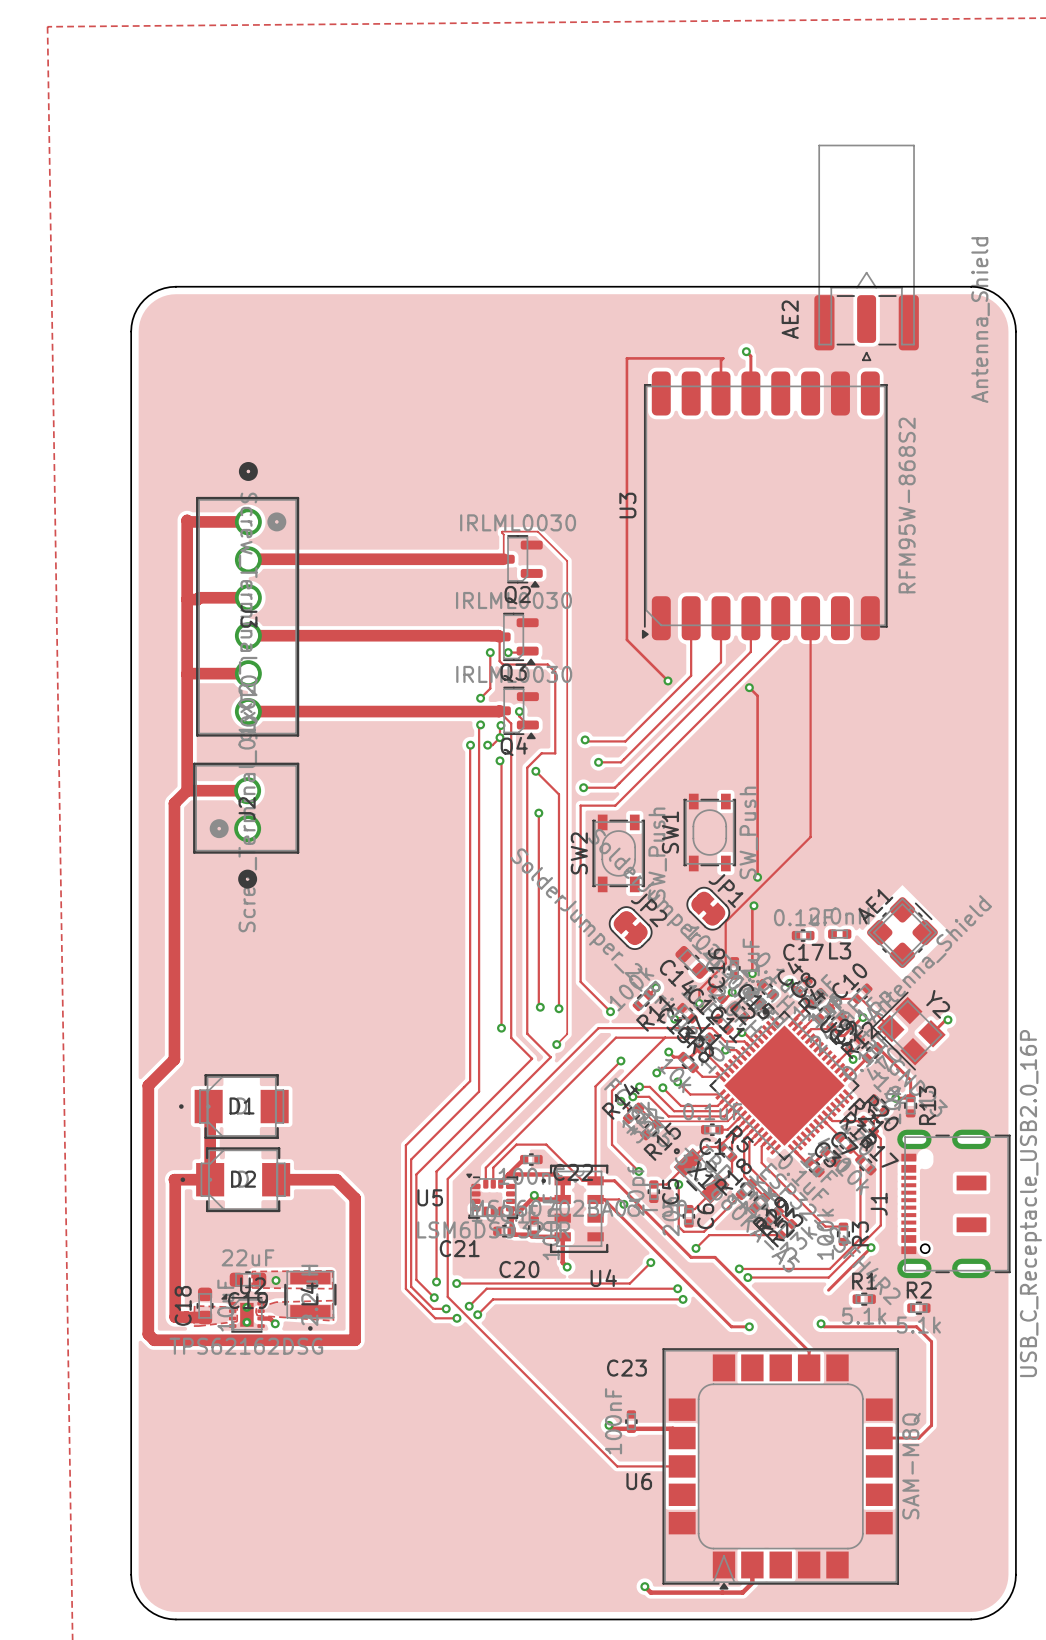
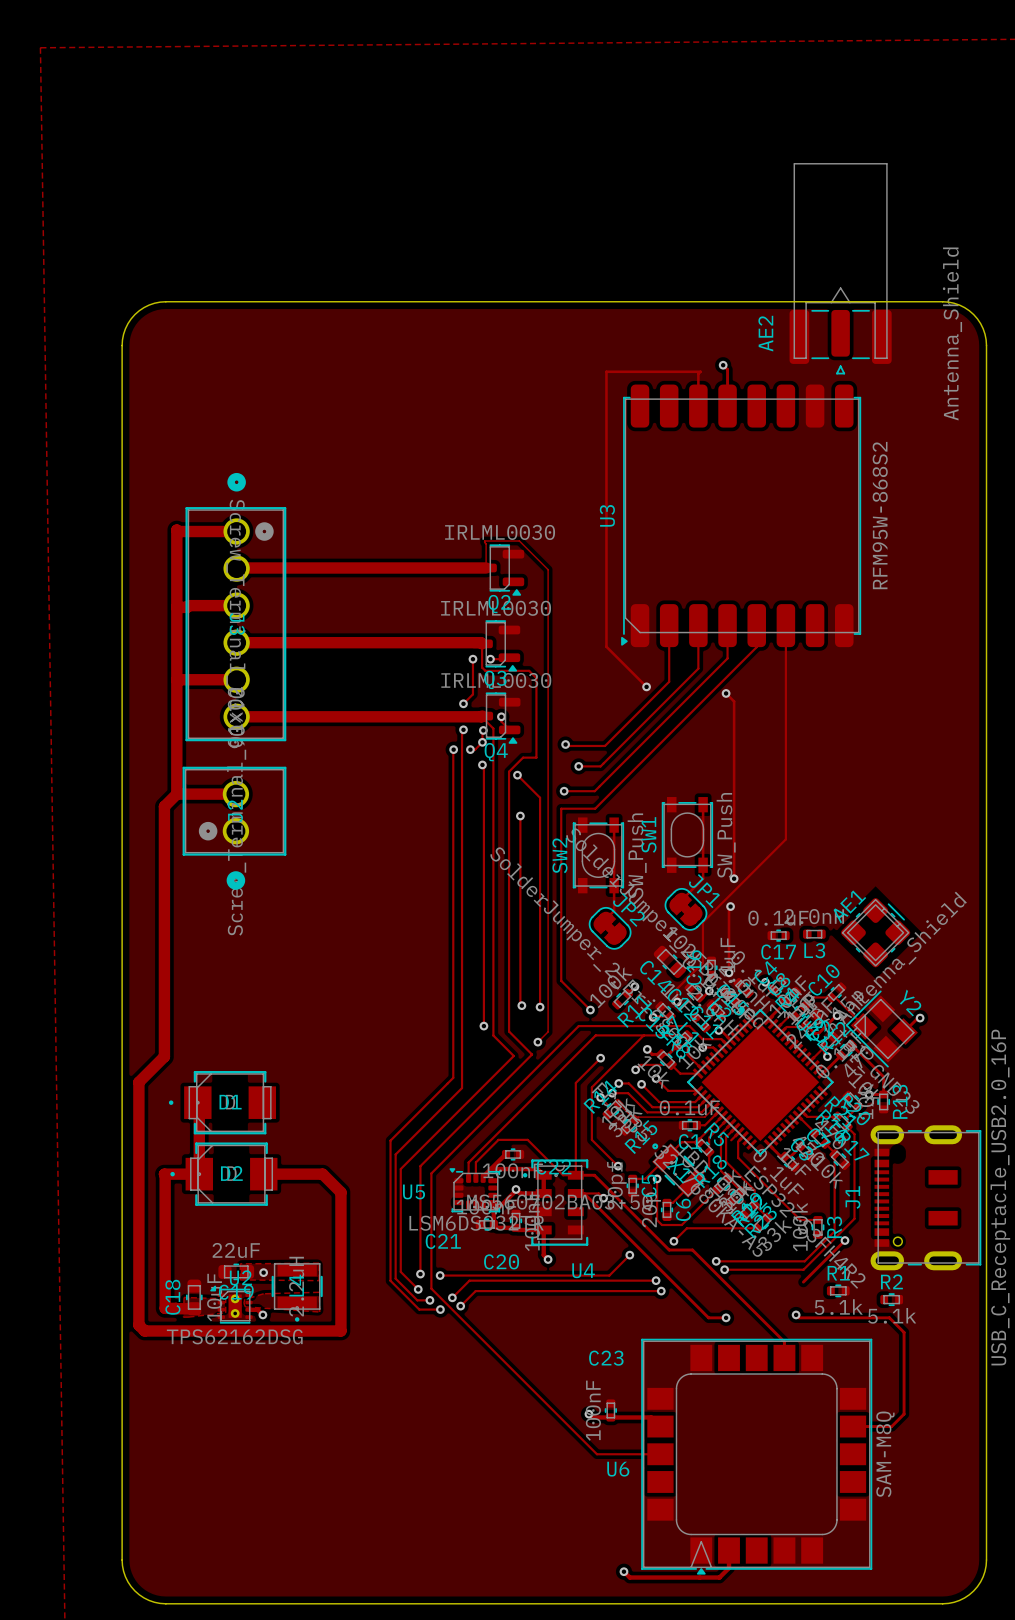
track: none -> (703, 804) (703, 878) (679, 902)
track: none -> (614, 825) (614, 910) (603, 921)

